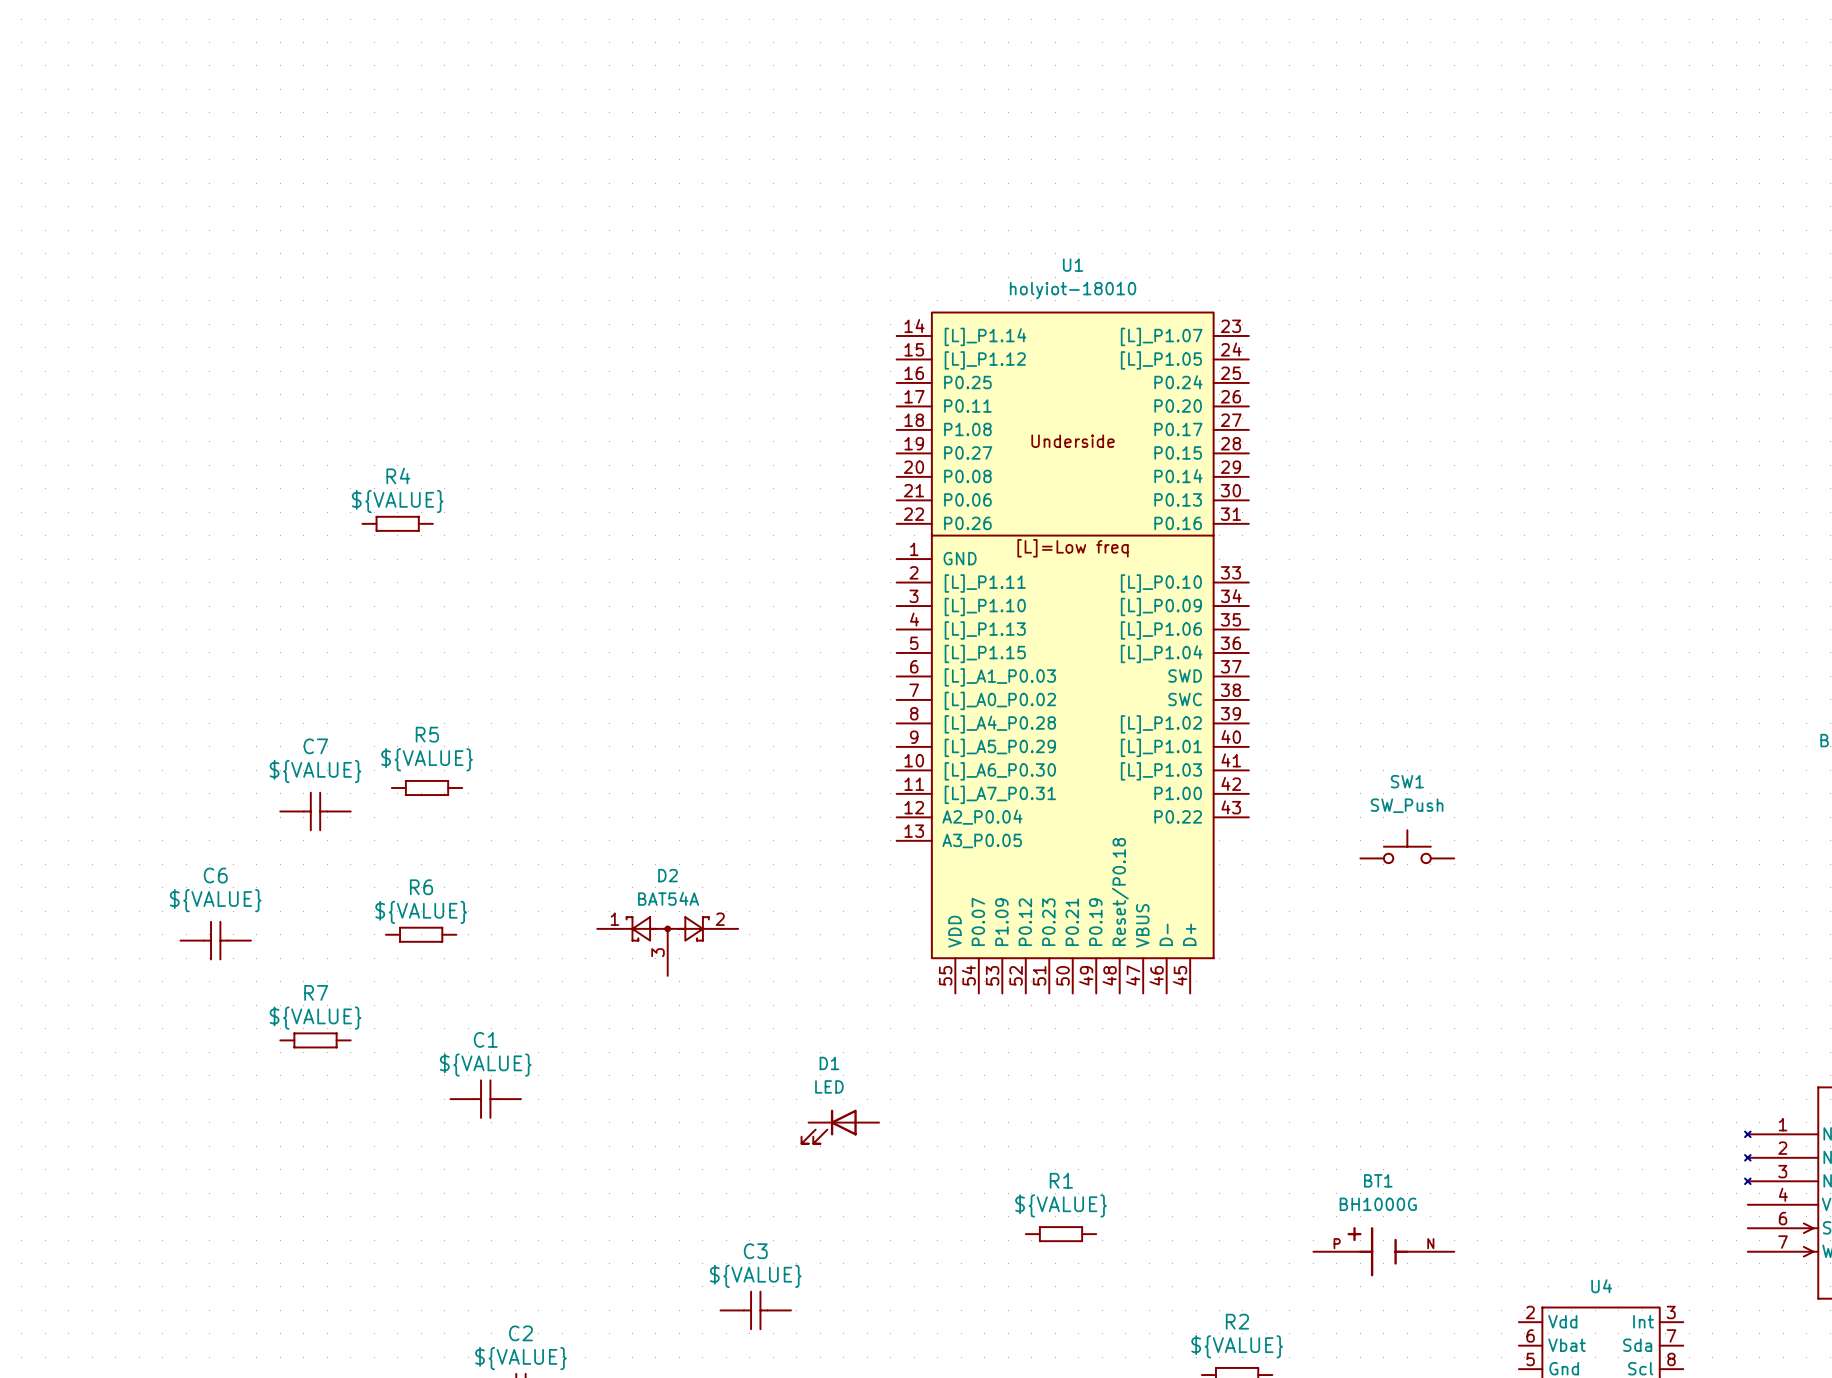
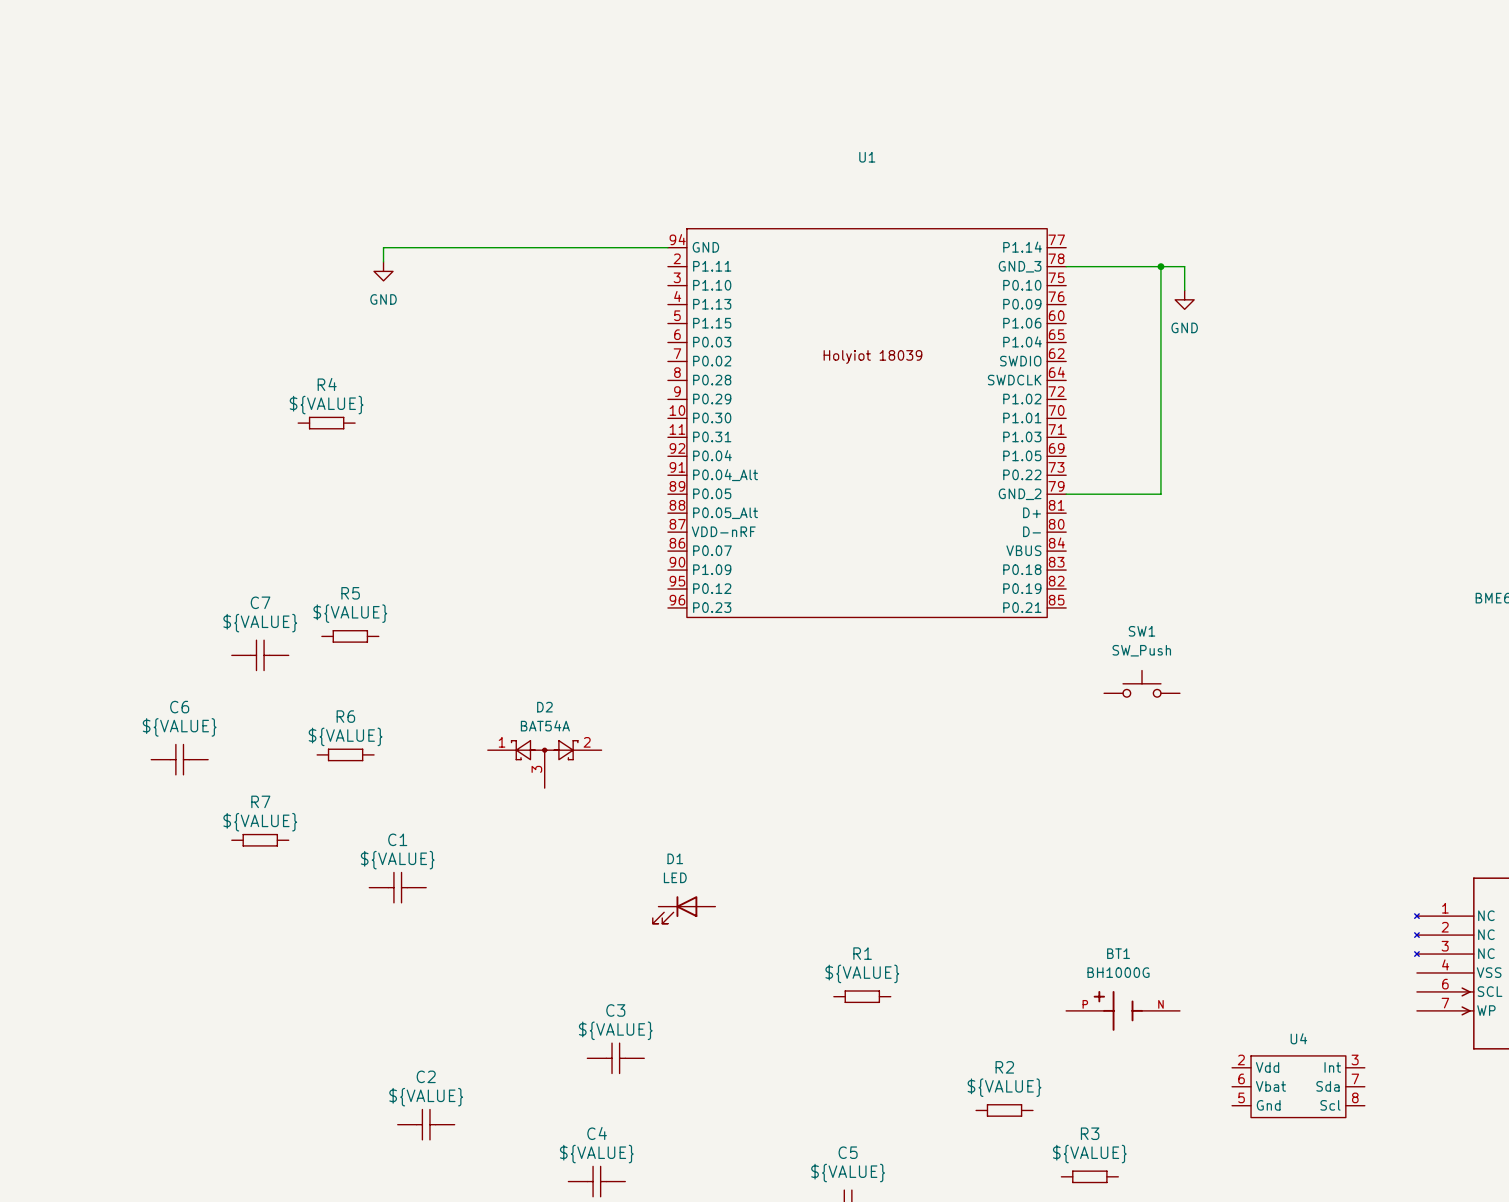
U1 name position: U1 (1073, 265) -> U1 (867, 157)
U1 value: holyiot-18010 (1073, 290) -> none
wire: none -> (667, 247) (383, 247) (383, 261)
U1 symbol: [896, 312, 1249, 994] -> [667, 228, 1067, 618]
wire: none -> (1066, 266) (1184, 266) (1184, 290)
wire: none -> (1160, 266) (1160, 494) (1066, 494)
junction: none -> (1160, 266)
power symbol: none -> GND (383, 271)
power symbol: none -> GND (1184, 299)

